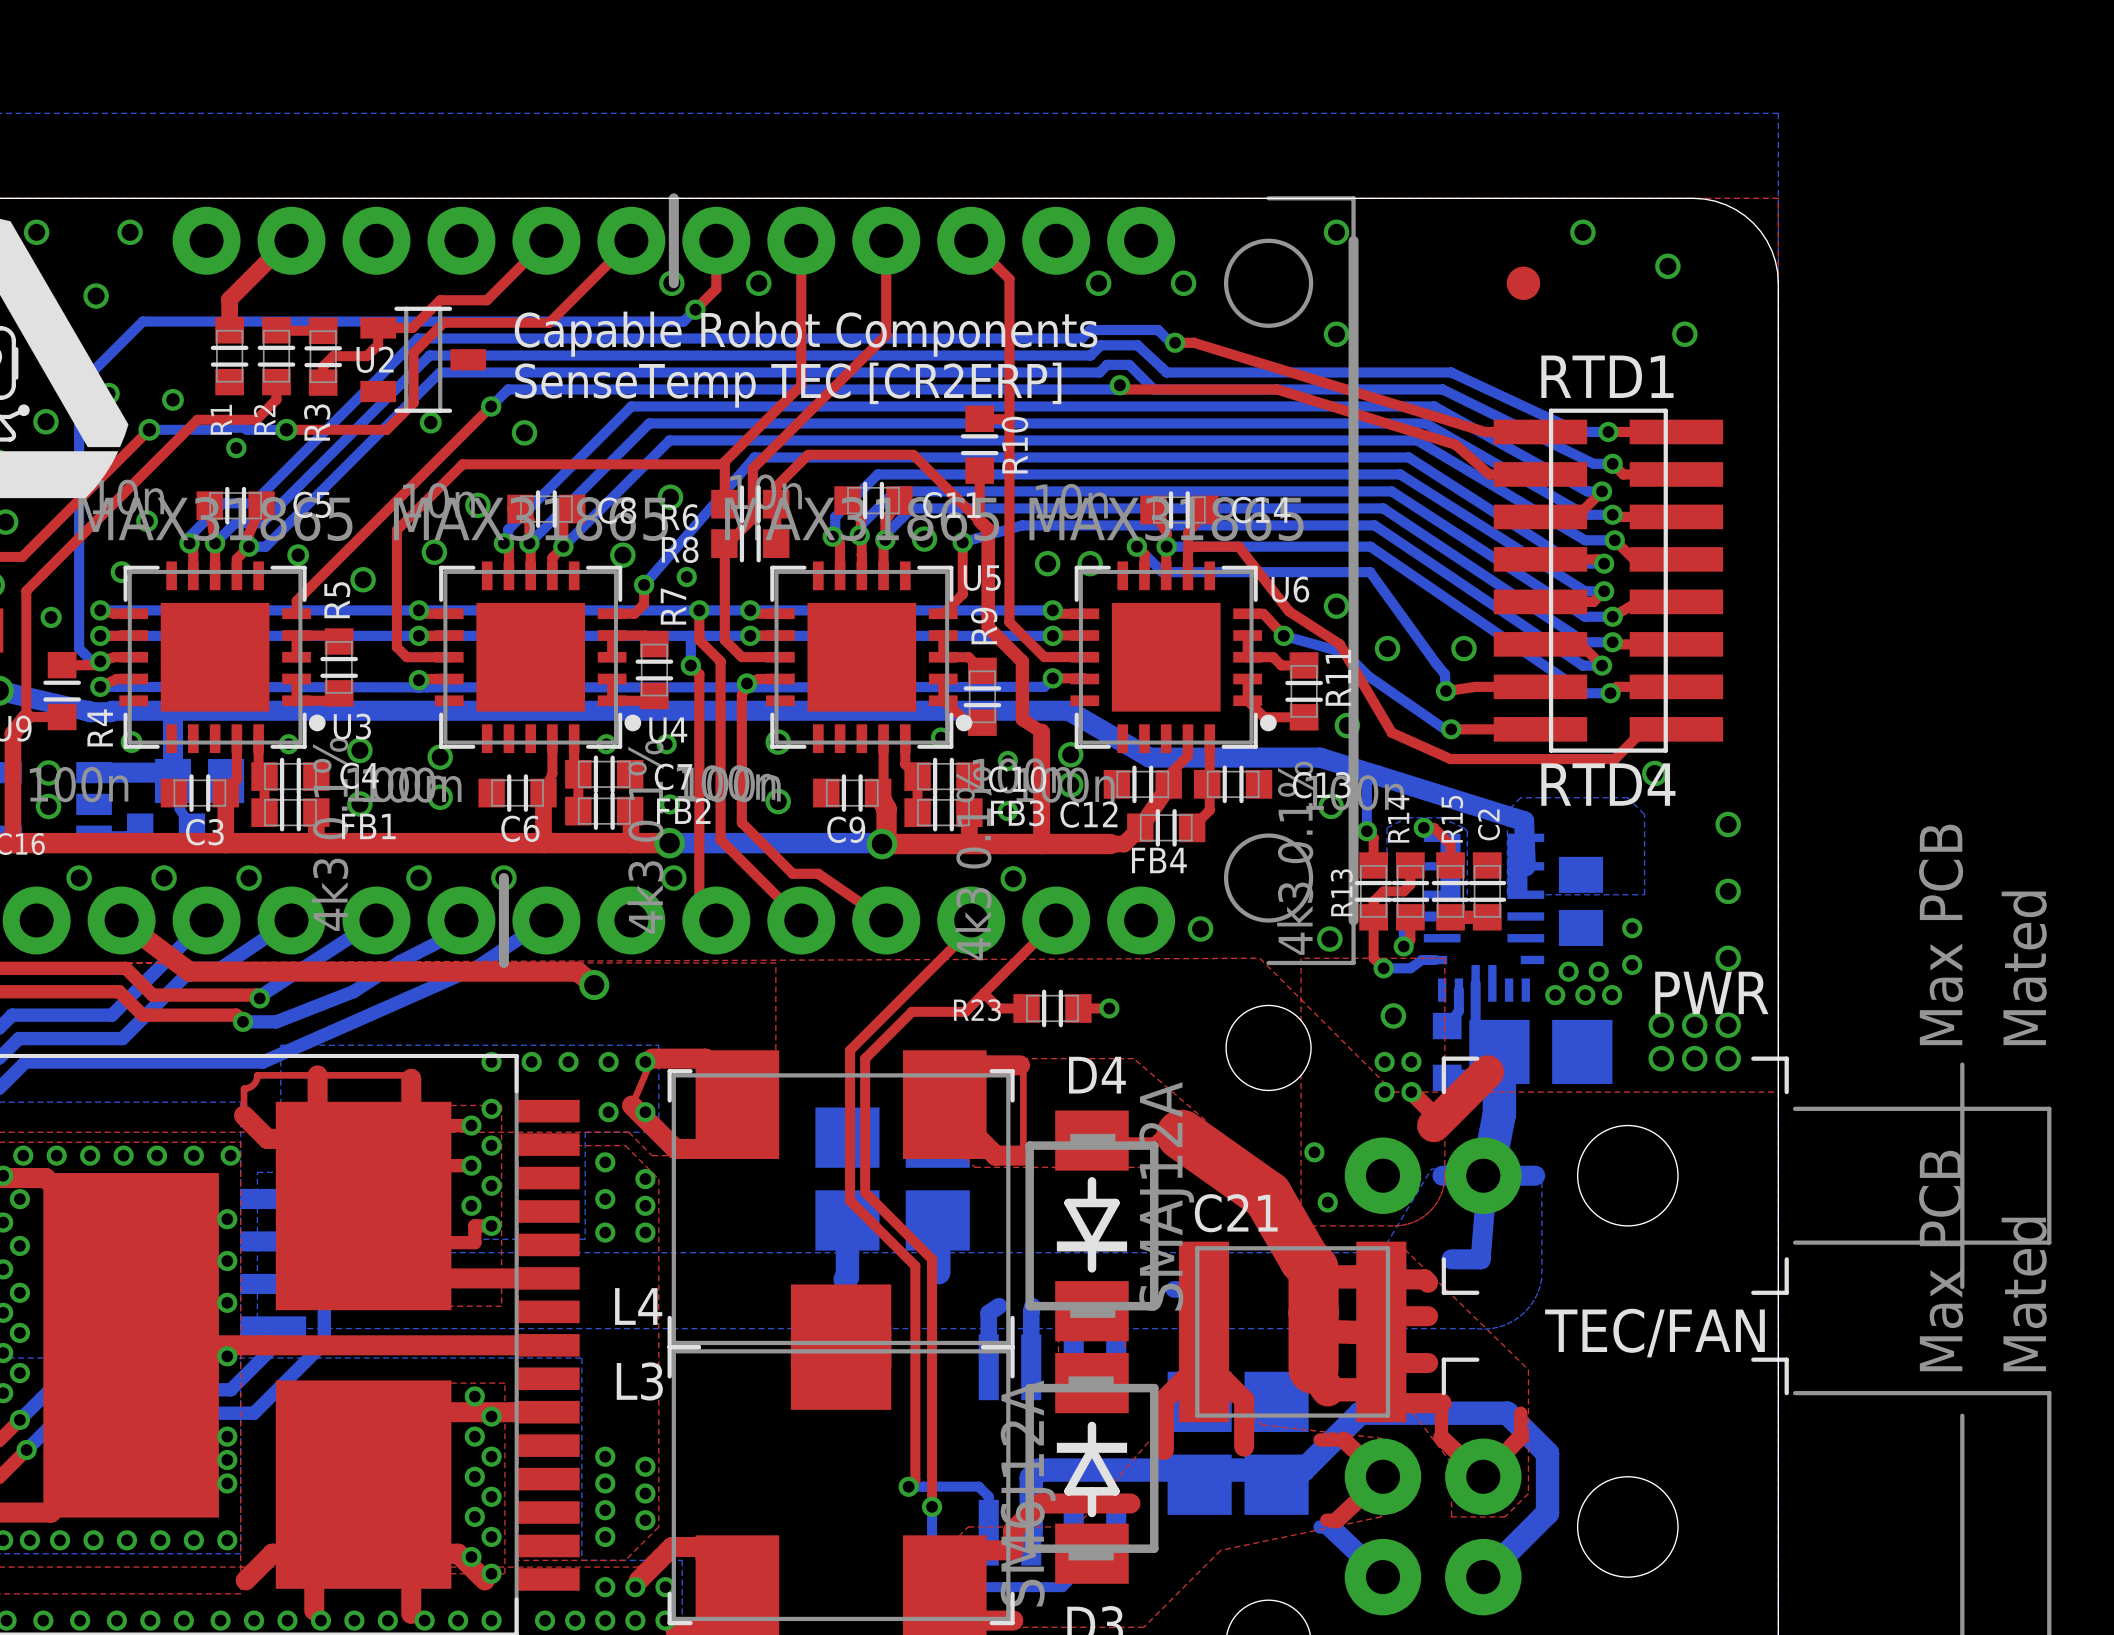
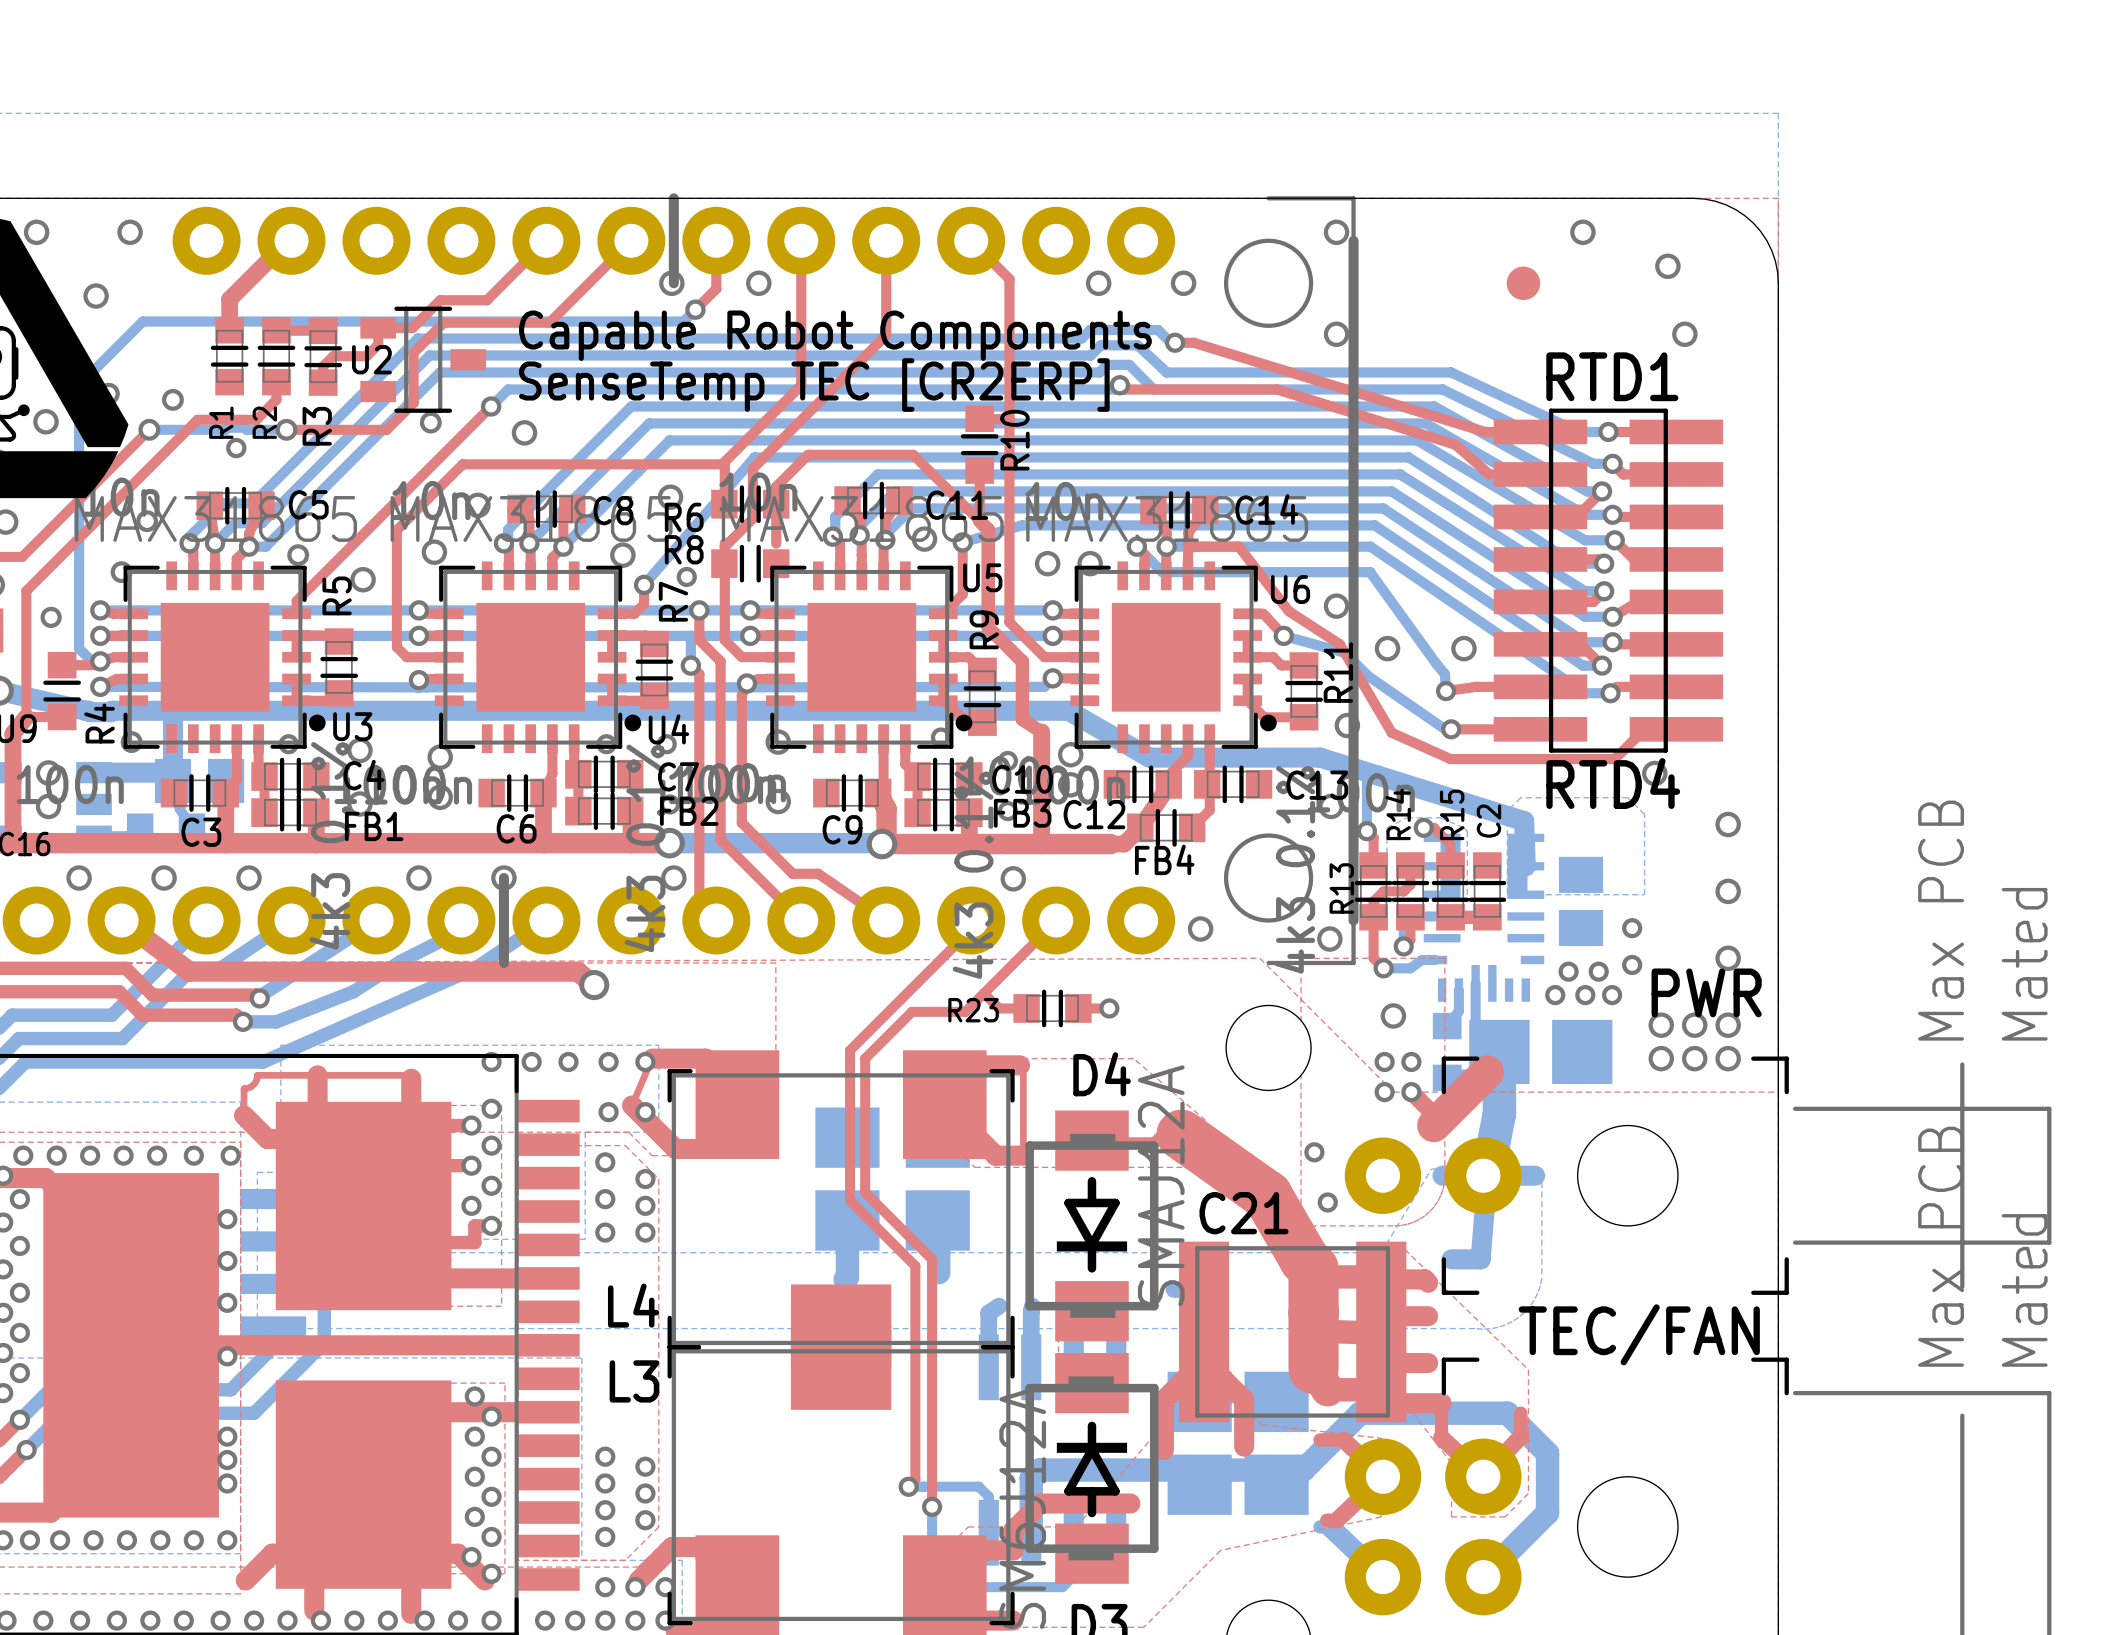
R8 position: (750, 543) -> (750, 563)

